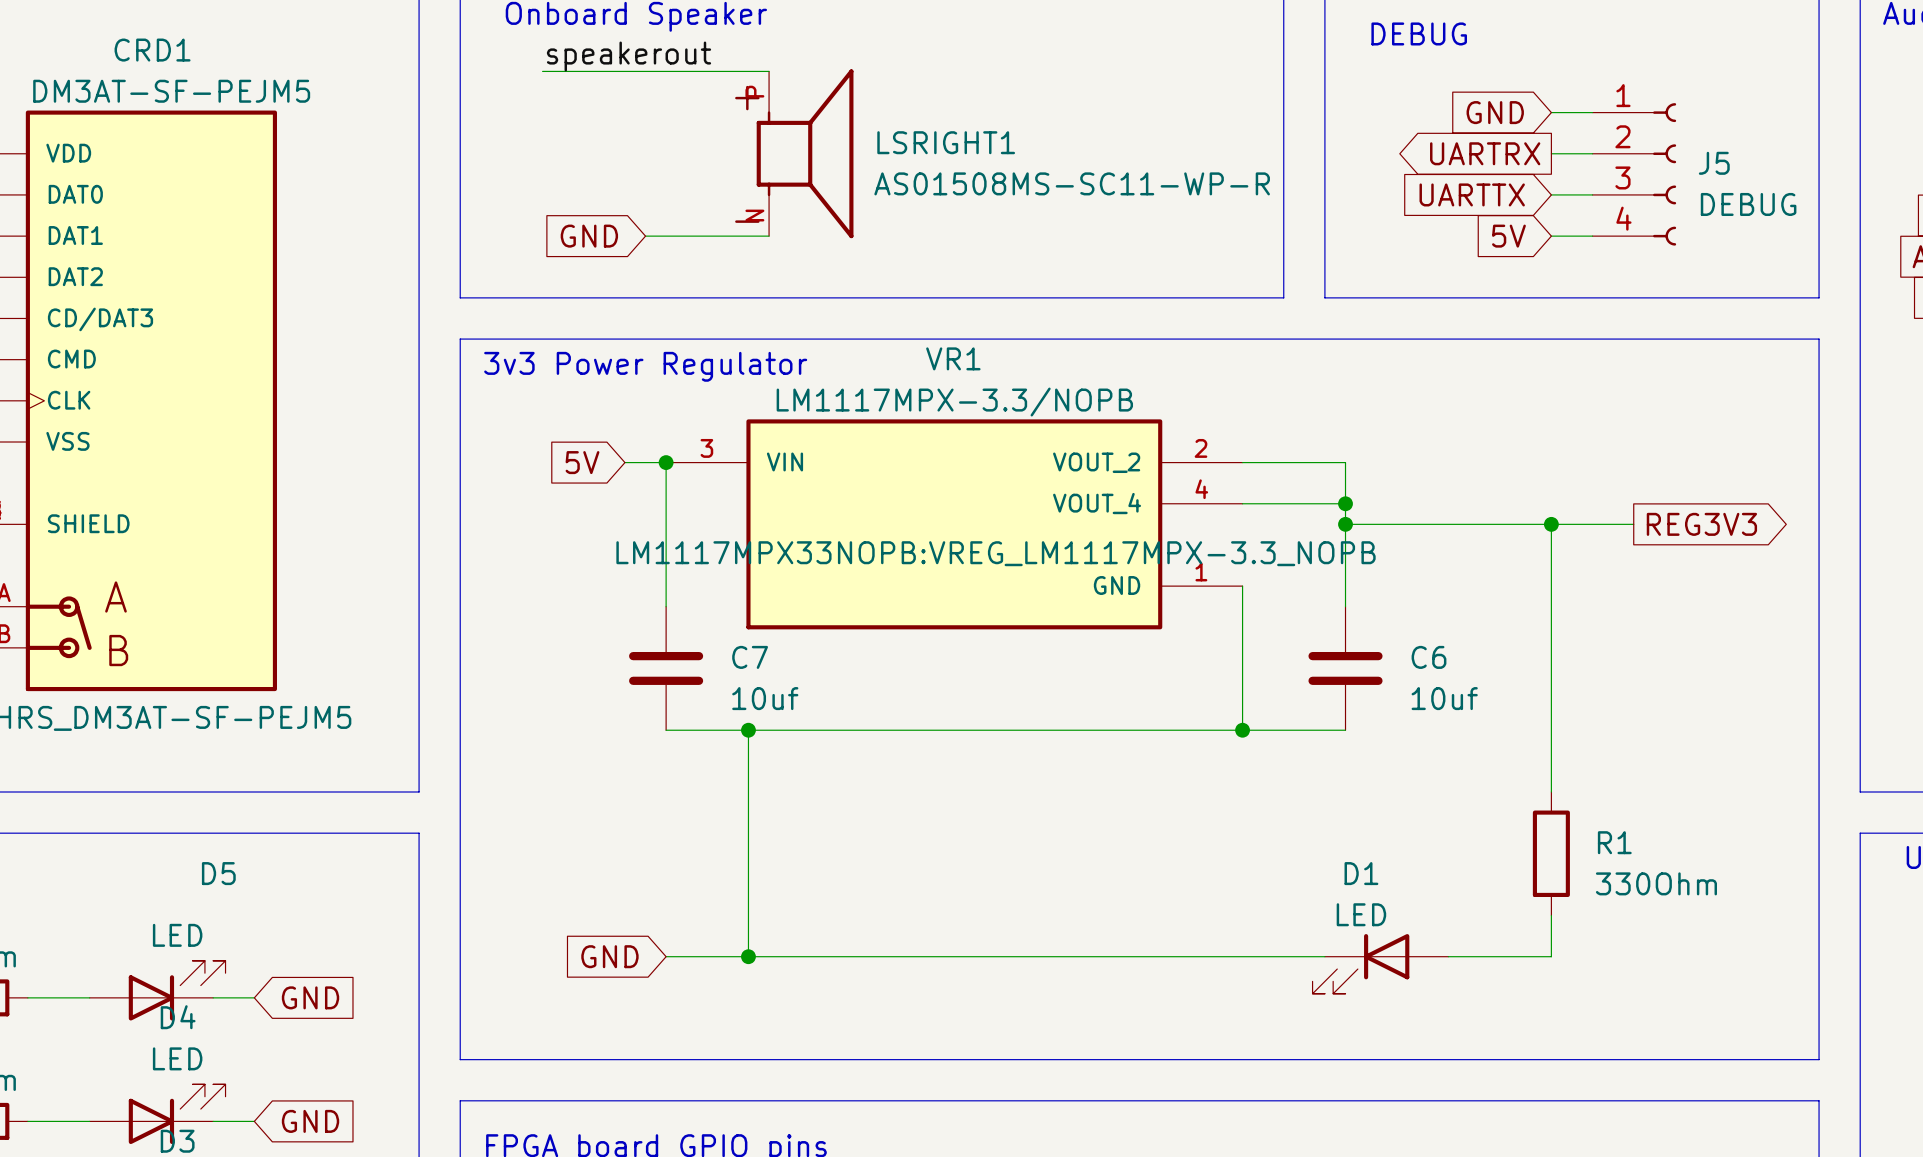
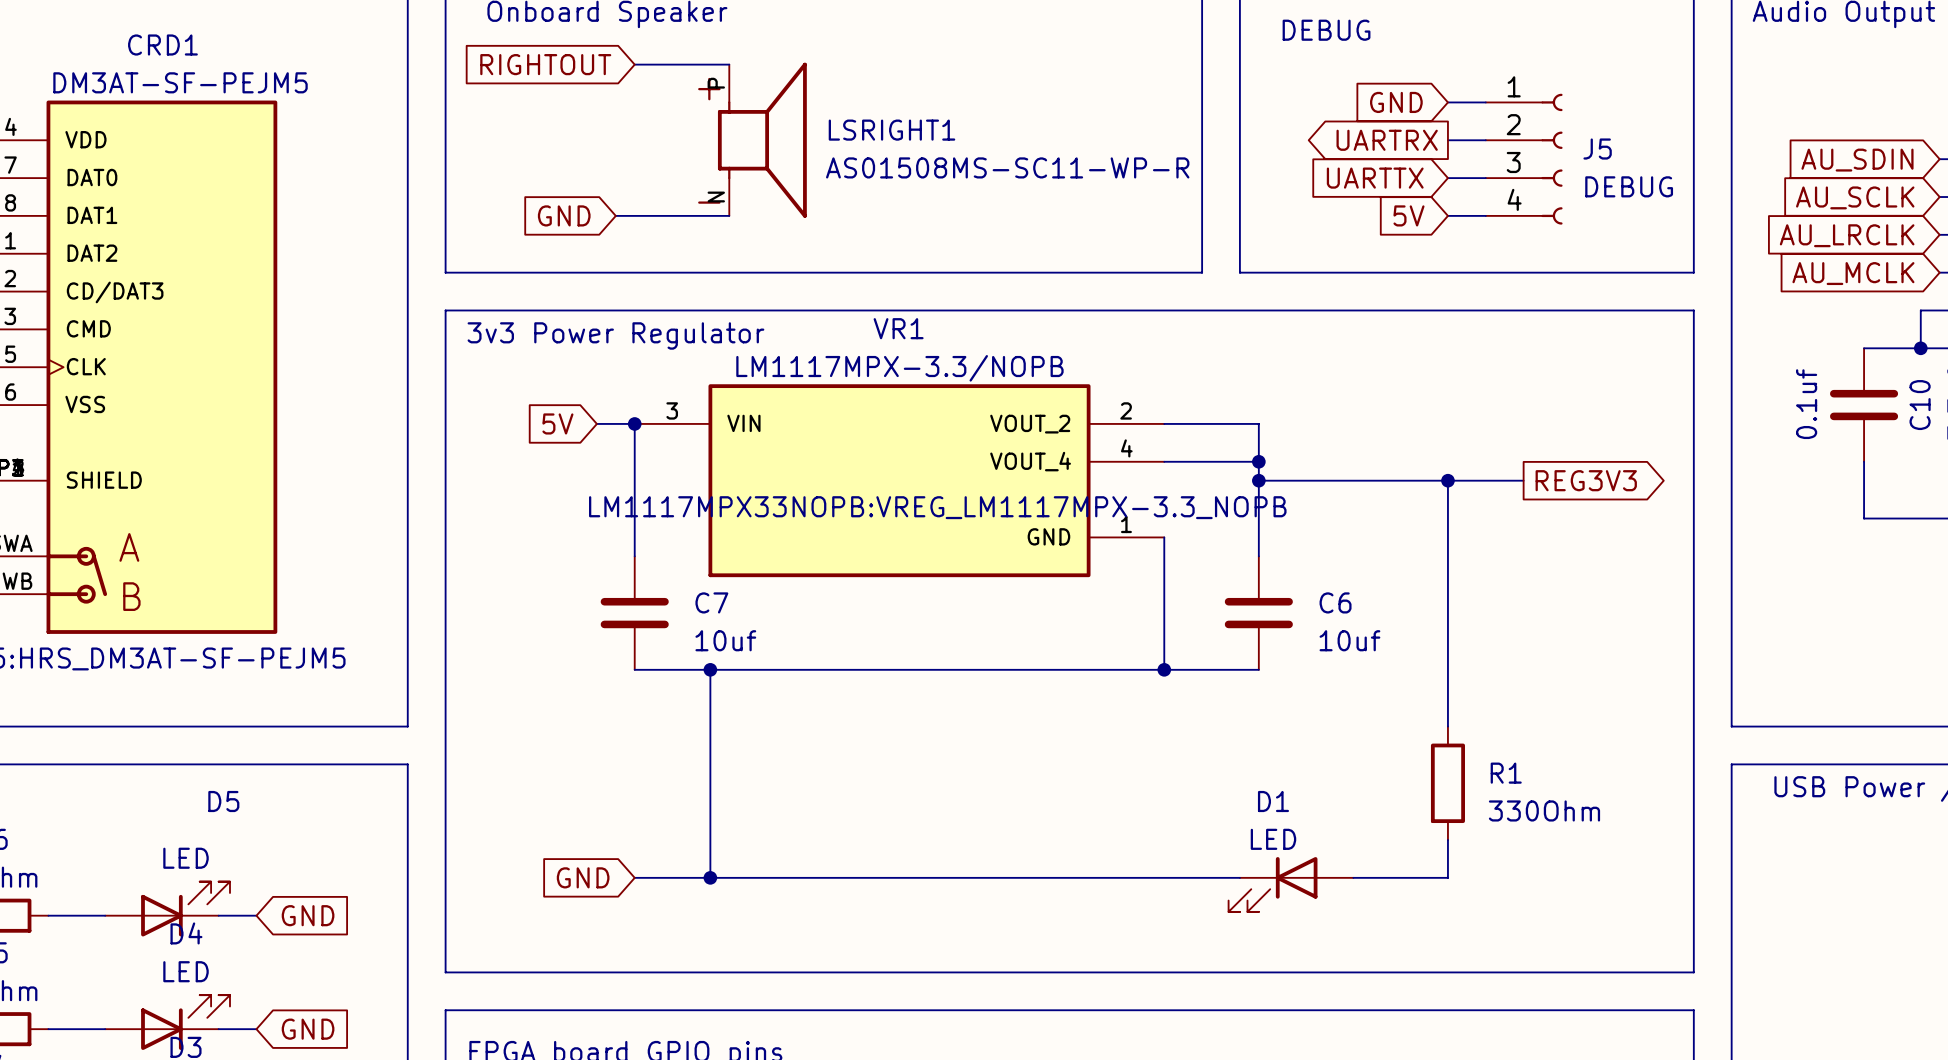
label: speakerout (629, 56) -> none
wire: (542, 71) (666, 71) -> none
global label: none -> RIGHTOUT (545, 64)

